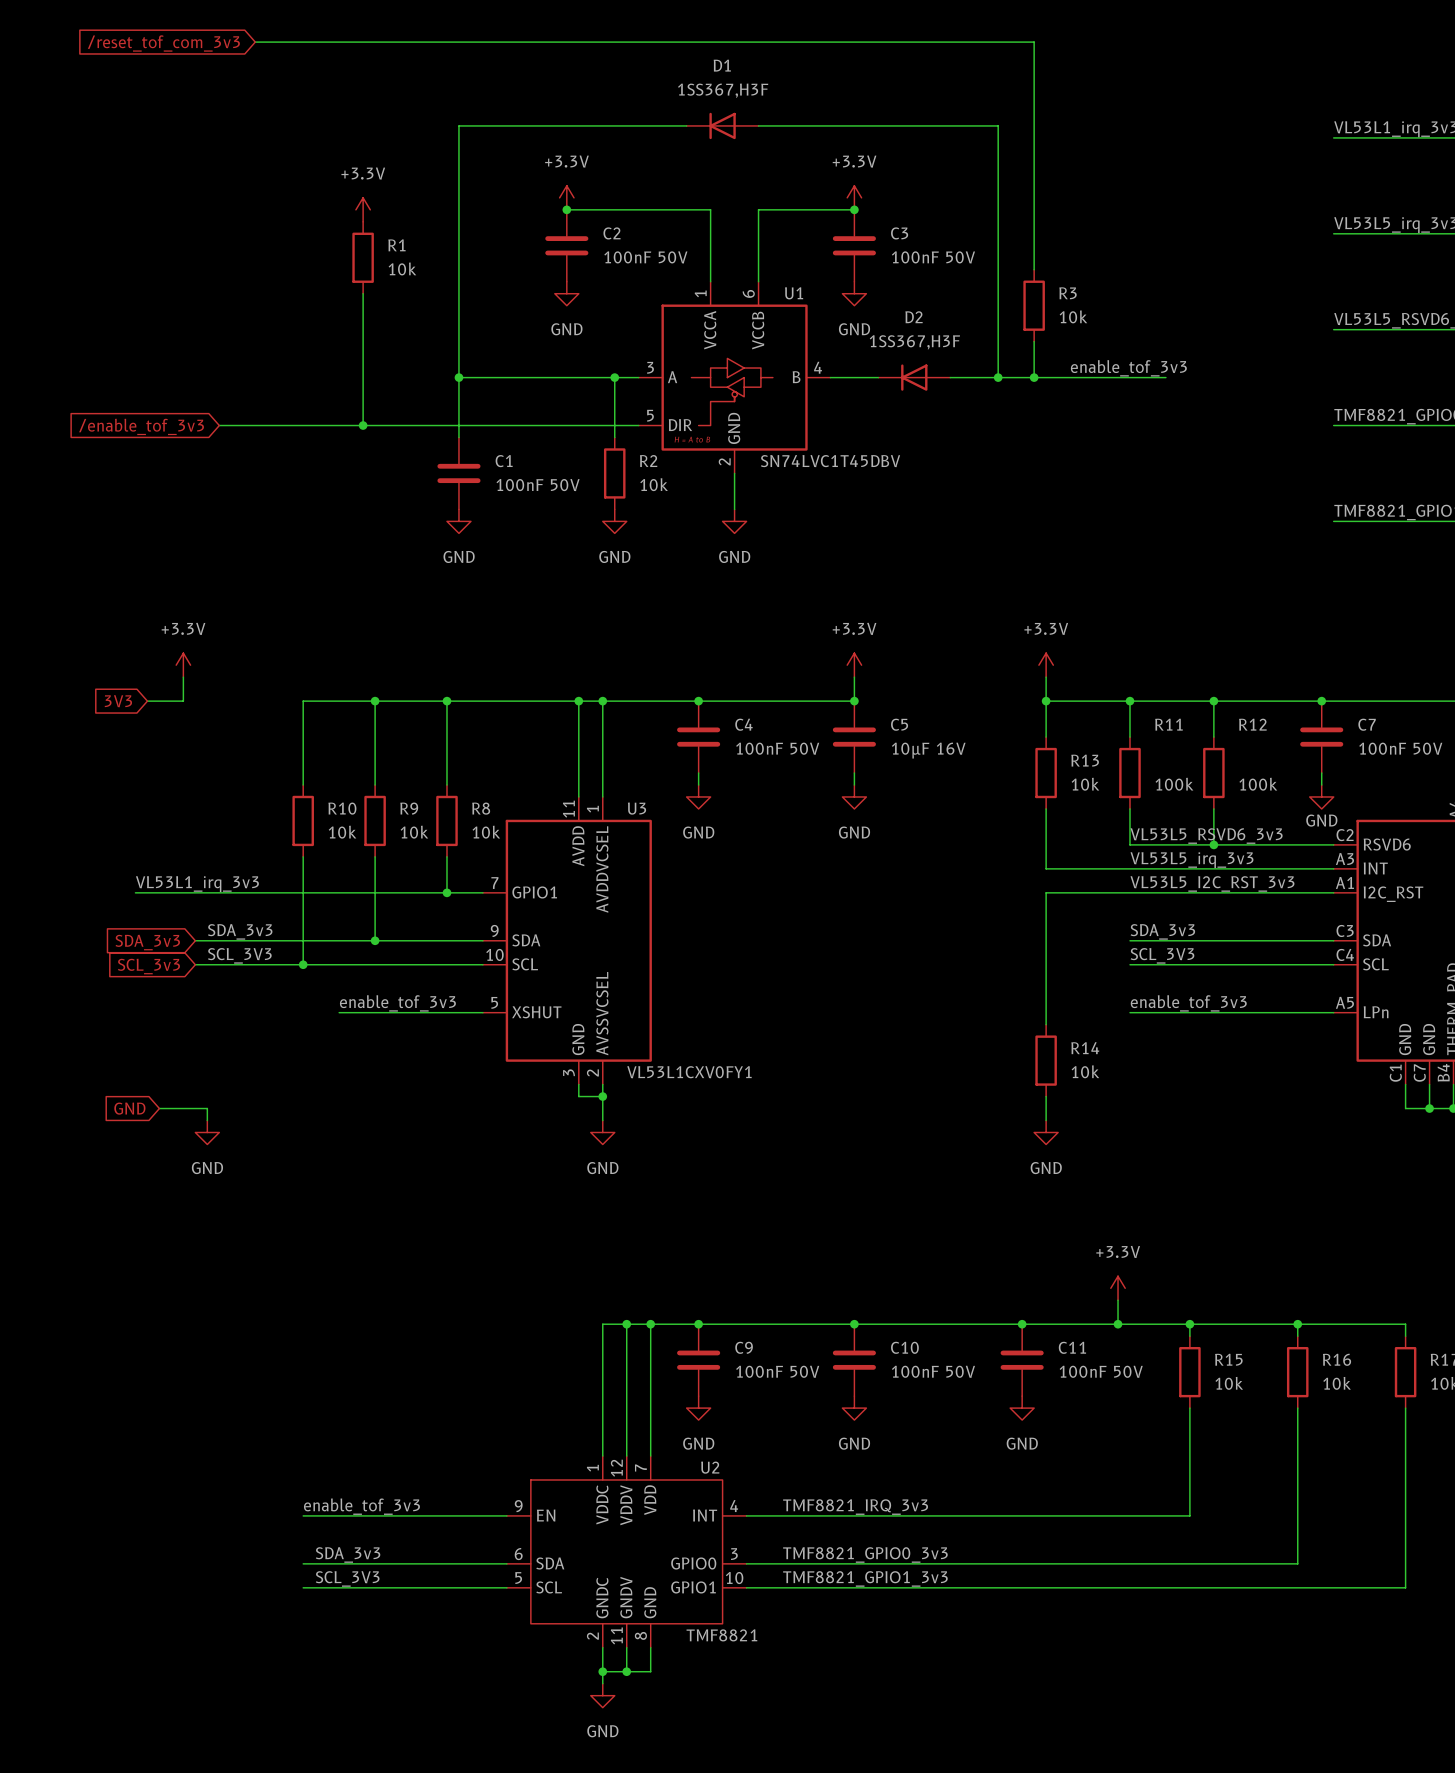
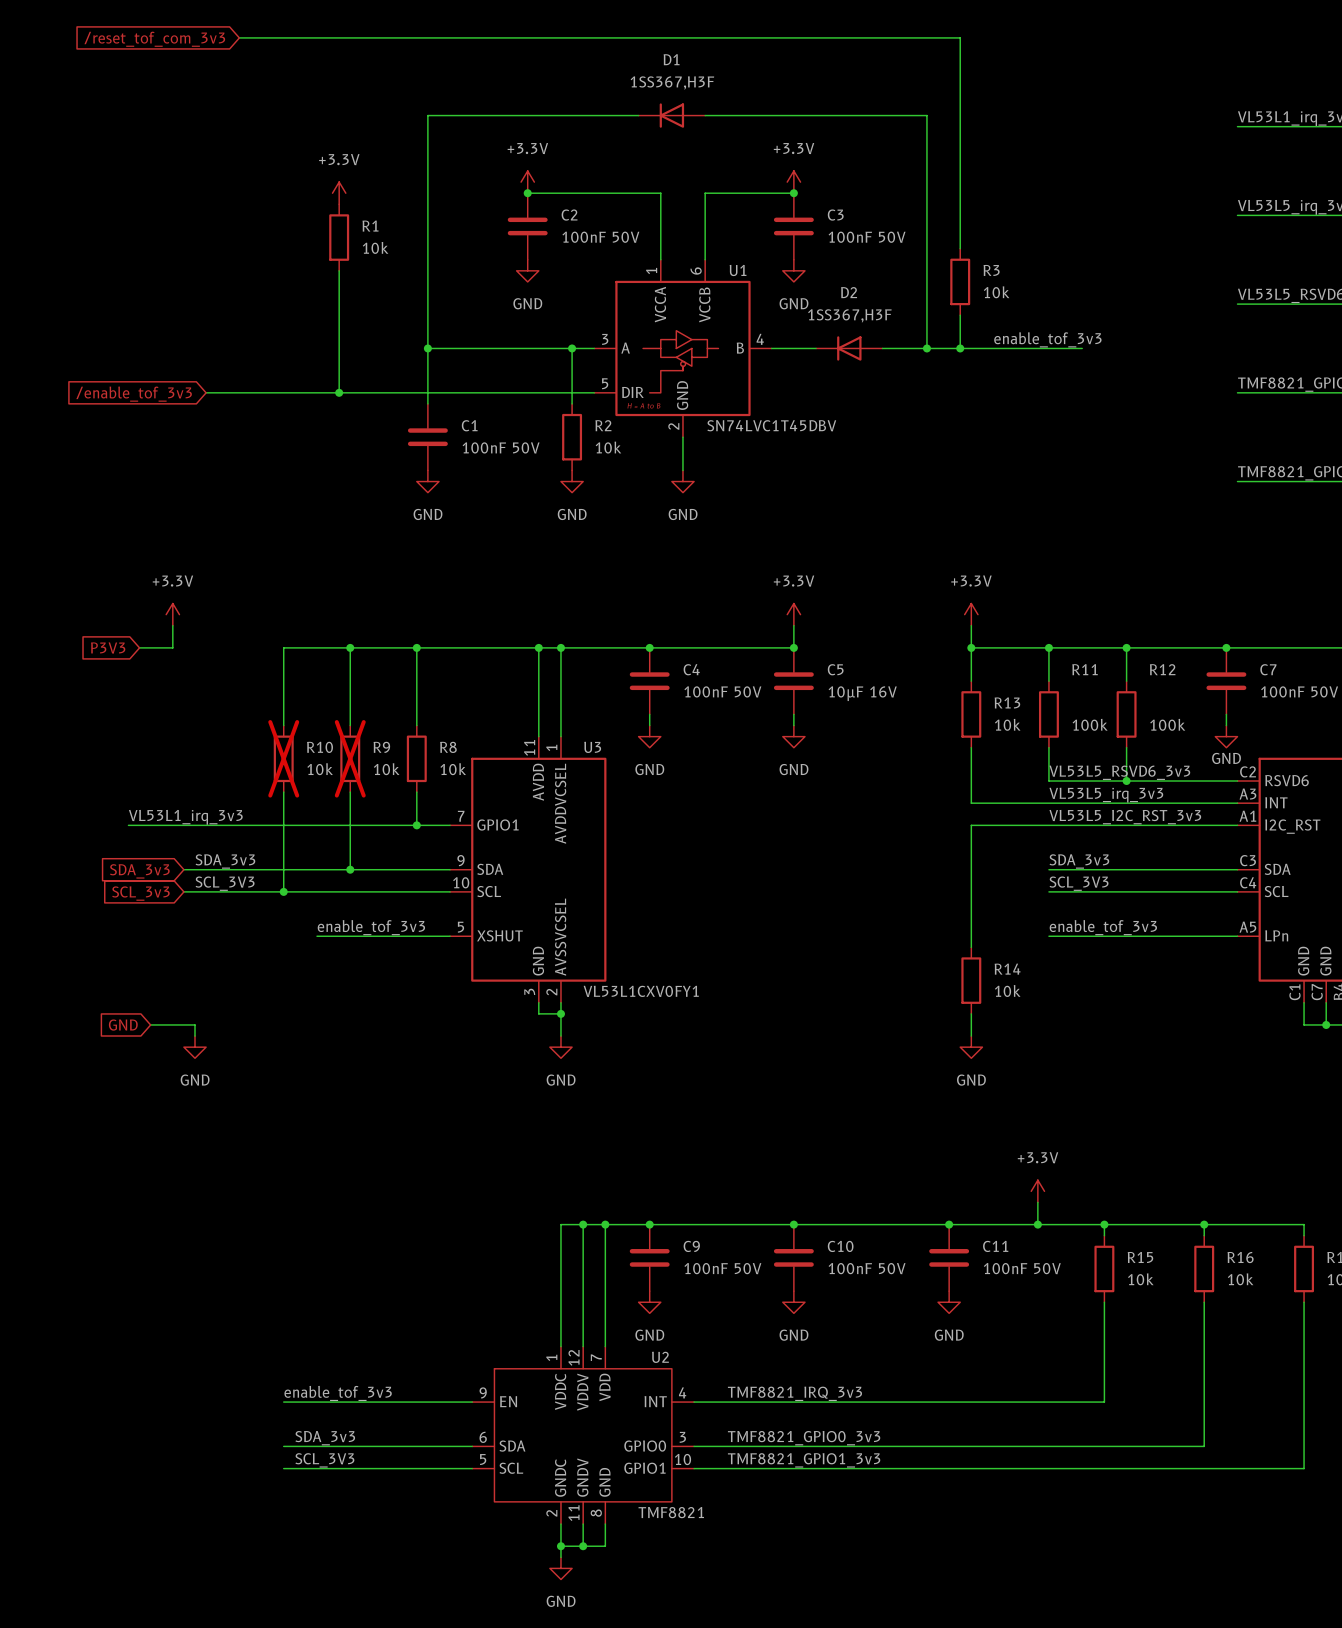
global label: 3V3 (118, 701) -> P3V3 (108, 647)
R10 do-not-place cross: none -> (283, 758)
R9 do-not-place cross: none -> (350, 758)

